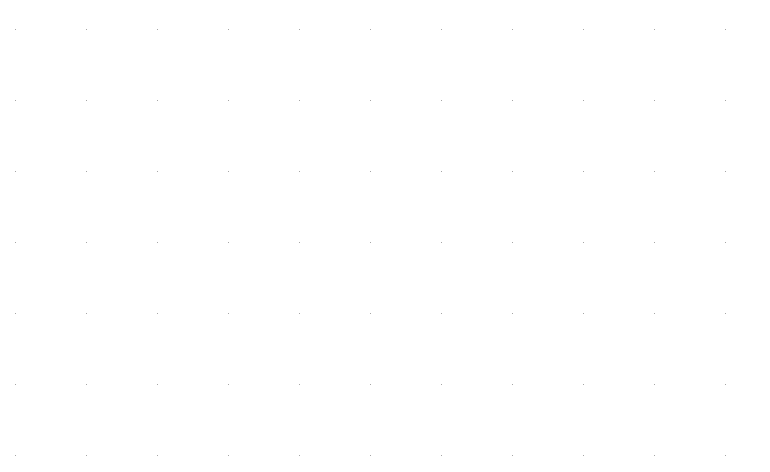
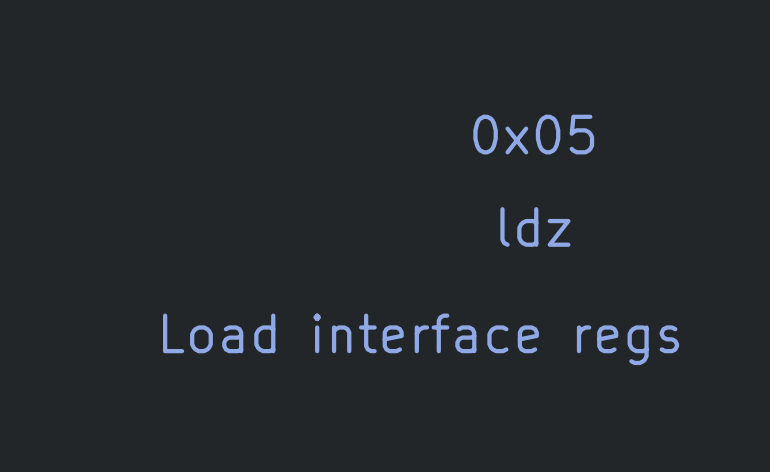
text: none -> 0x05 (533, 134)
text: none -> ldz (535, 226)
text: none -> Load interface regs (421, 339)

